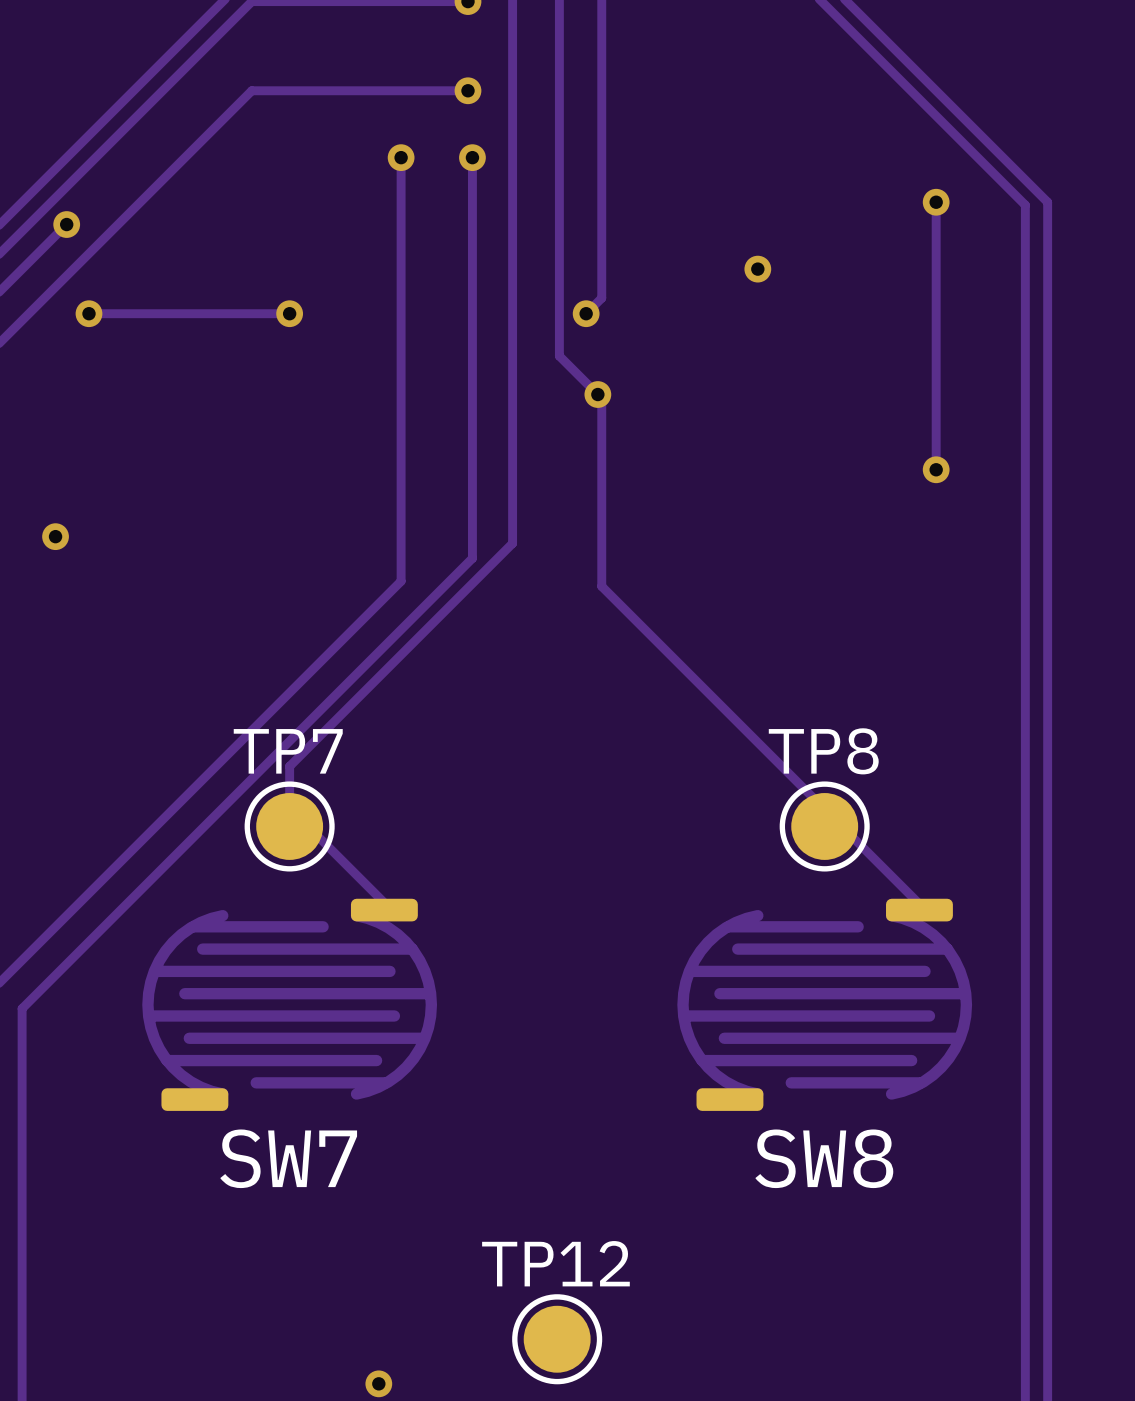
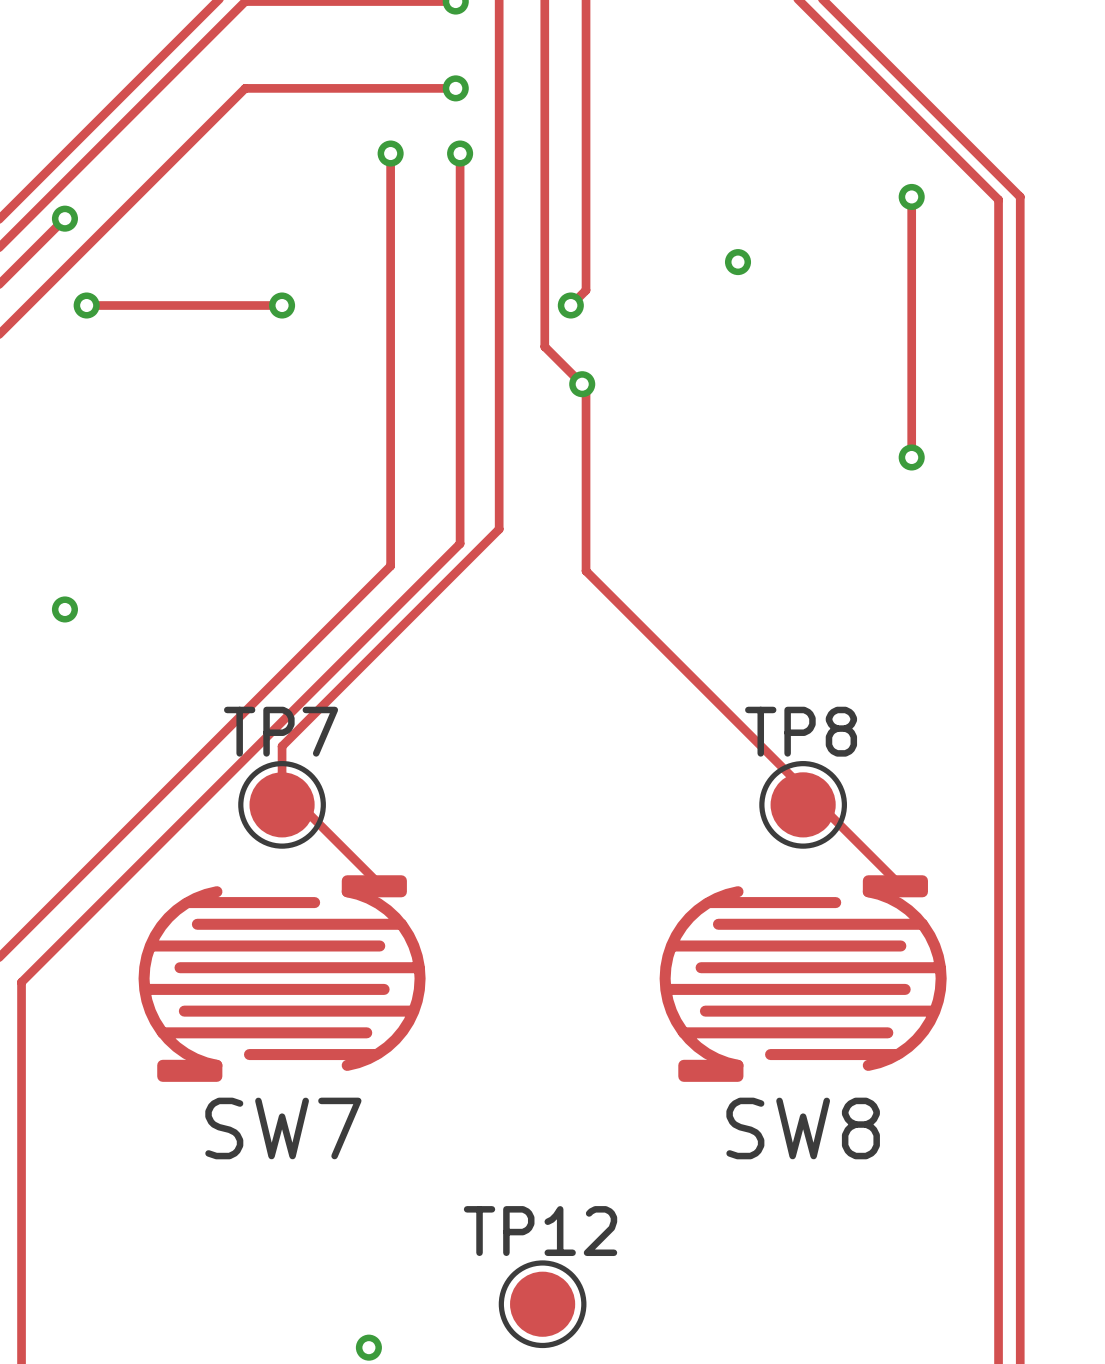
via position: (55, 536) -> (64, 609)

